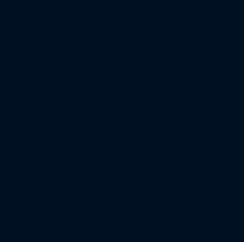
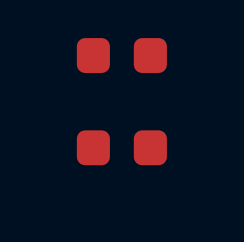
part: none -> (121, 55)
part: none -> (121, 147)

